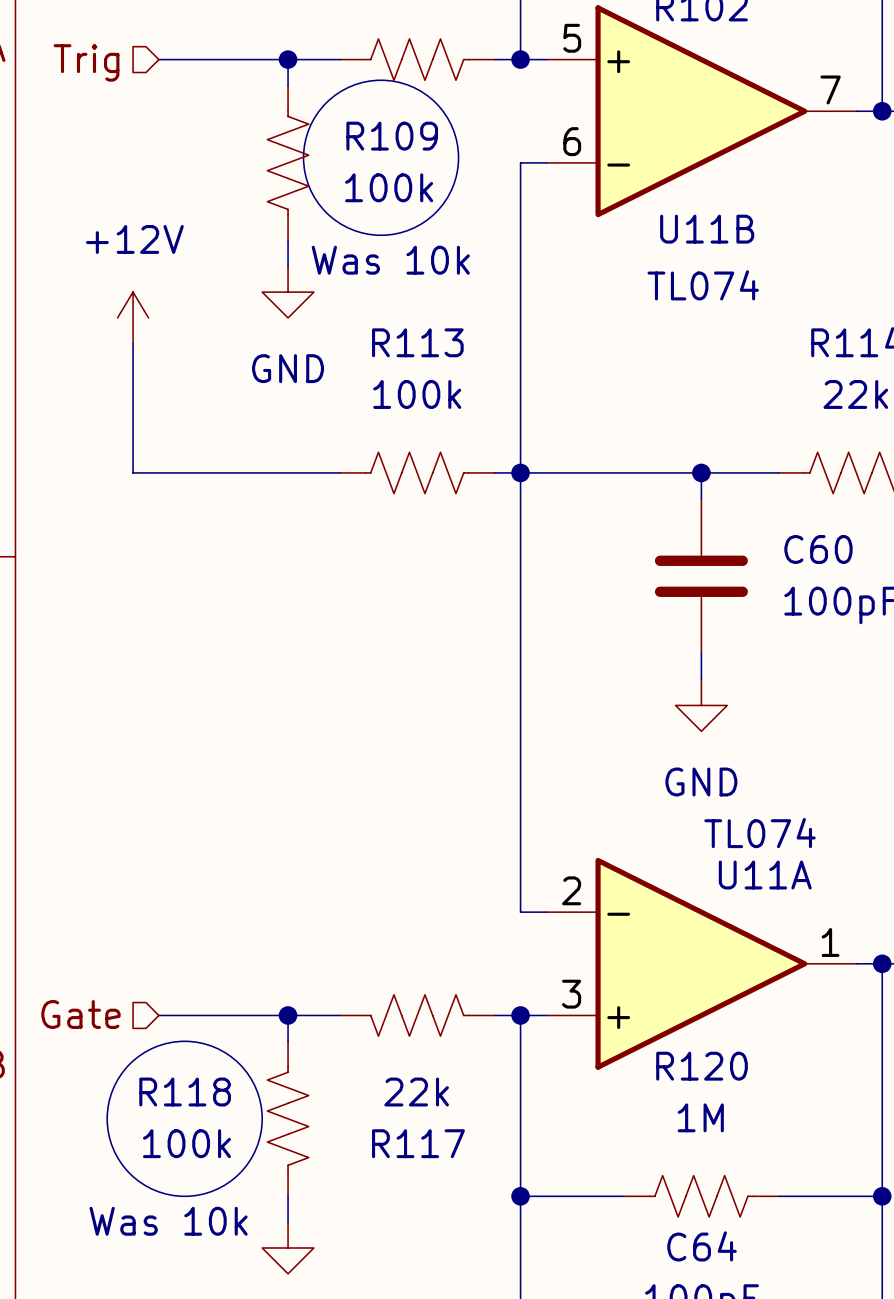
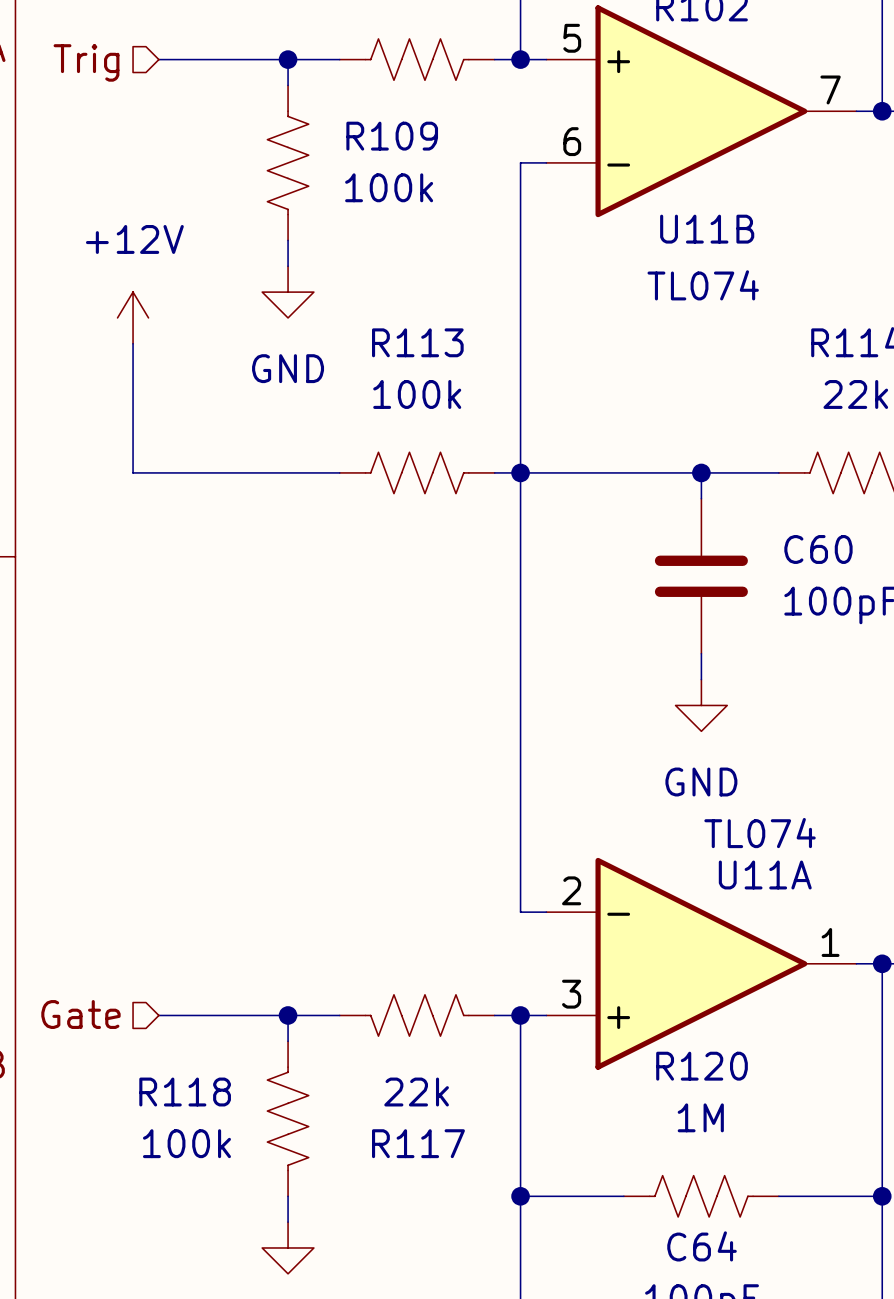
drawing: [303, 80, 459, 236] -> none
text: Was 10k (390, 260) -> none
drawing: [107, 1041, 263, 1197] -> none
text: Was 10k (168, 1221) -> none

